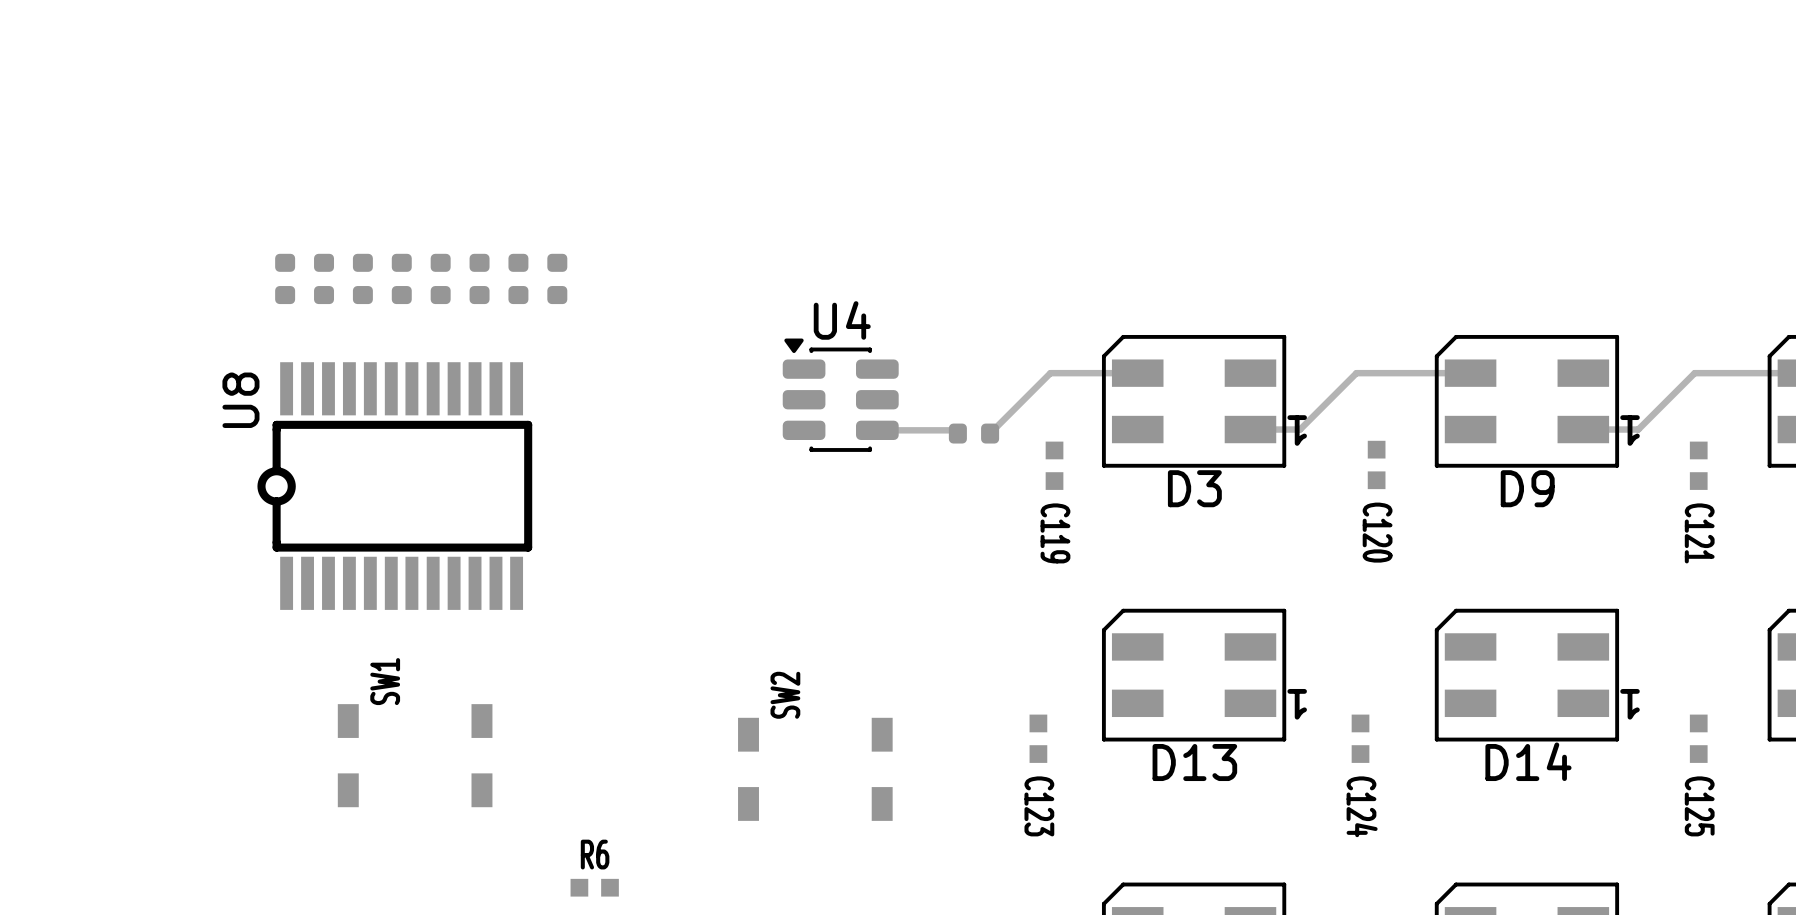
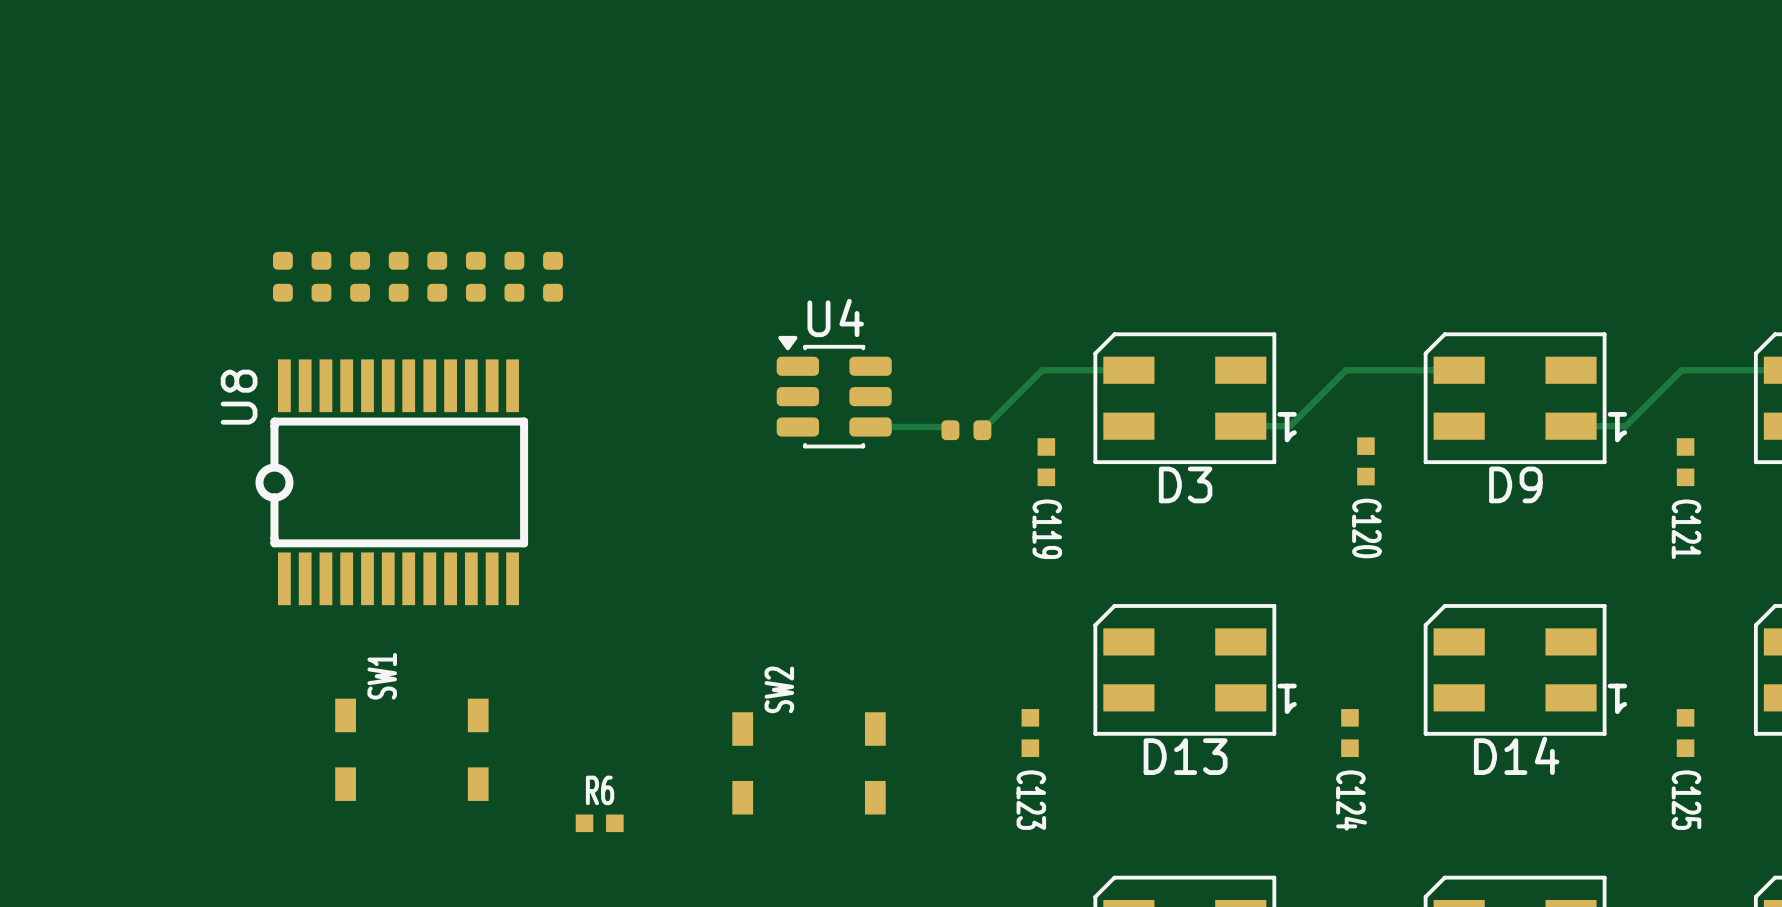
R6 position: (594, 887) -> (599, 823)

